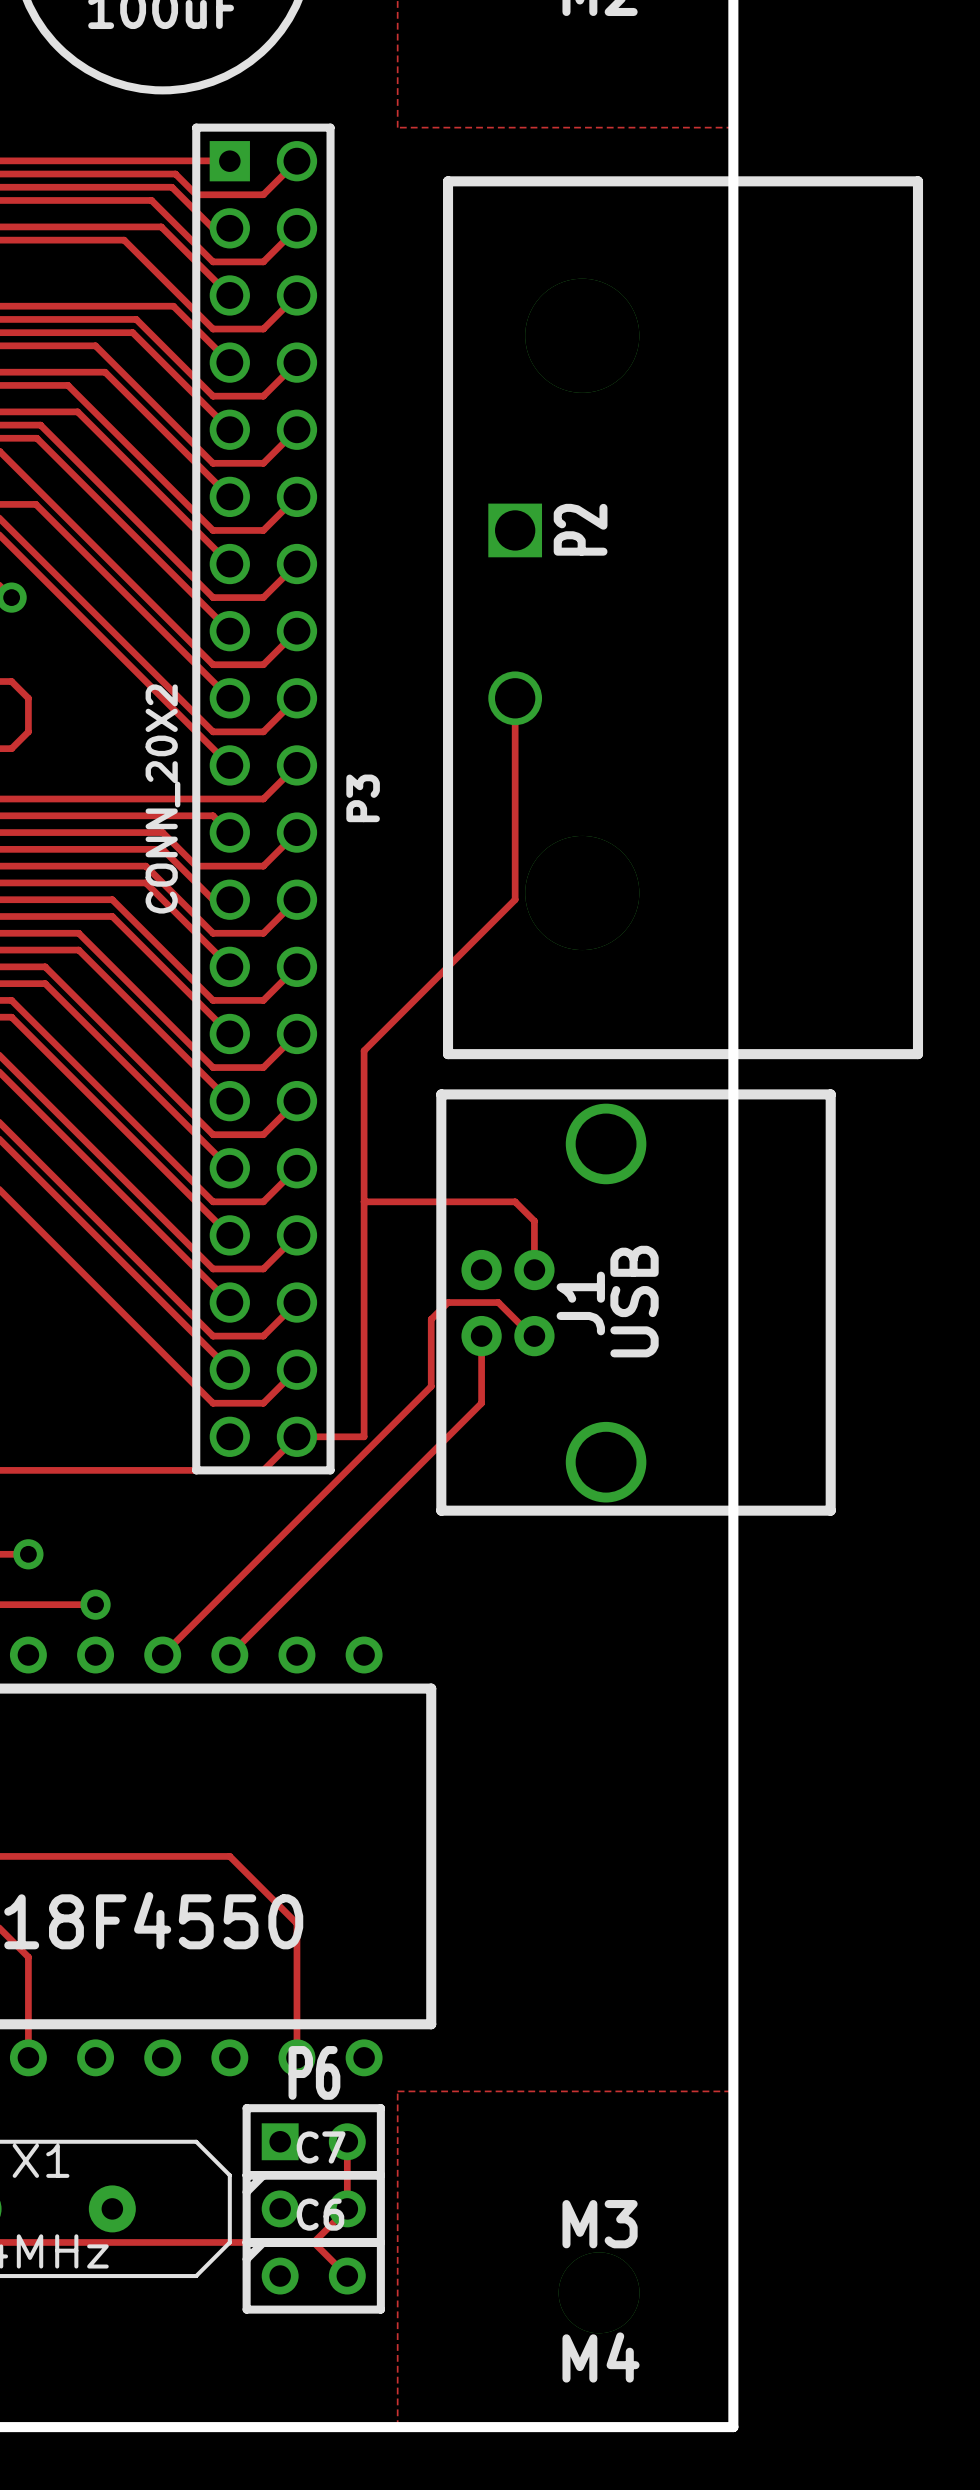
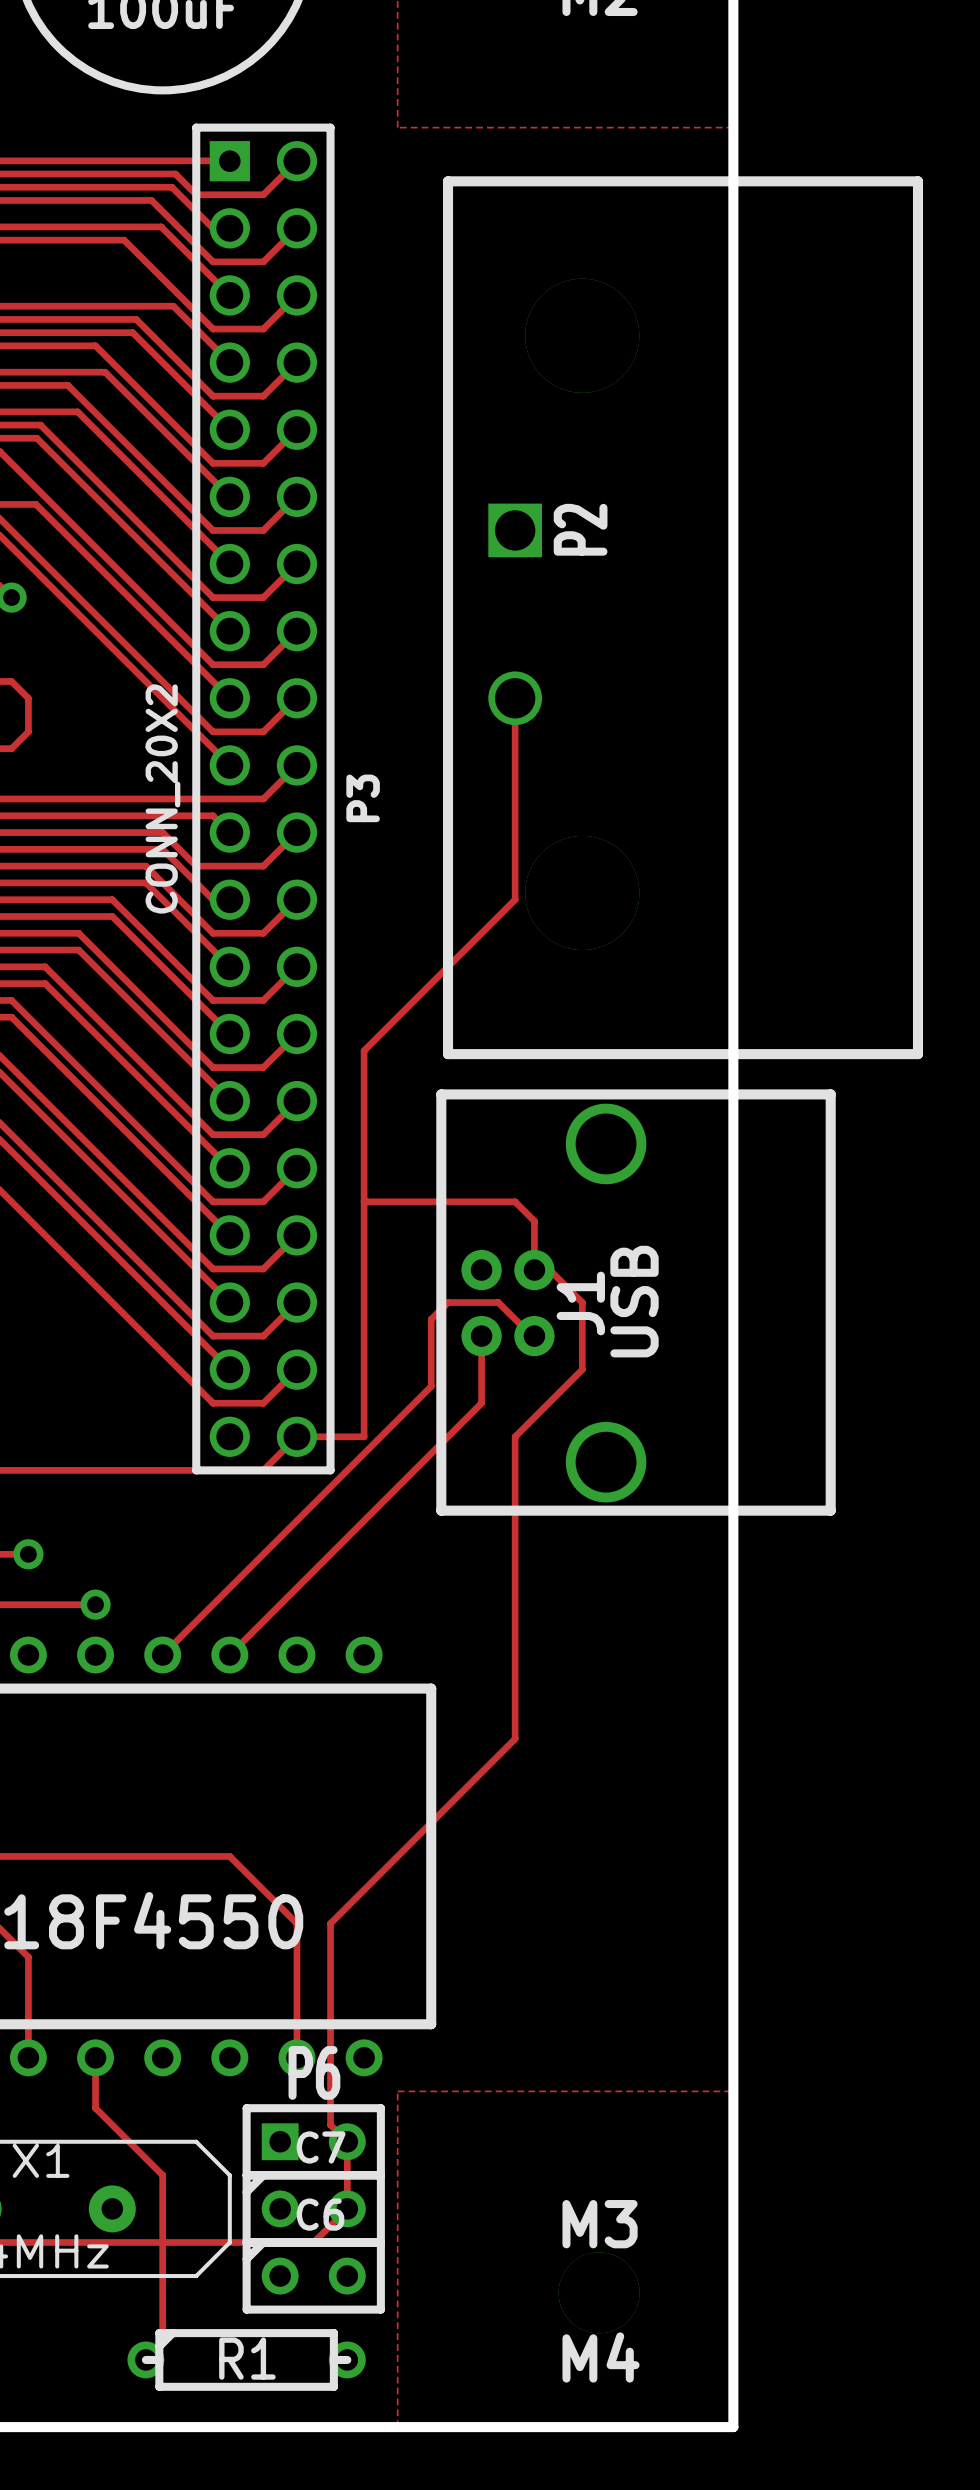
track: none -> (534, 1270) (549, 1270) (582, 1302) (582, 1369) (515, 1436) (515, 1738) (330, 1923) (330, 2124) (347, 2141)
track: none -> (95, 2057) (95, 2108) (162, 2175) (162, 2343) (145, 2359)
track: (313, 2242) (347, 2276) -> none
R1: none -> (246, 2359)

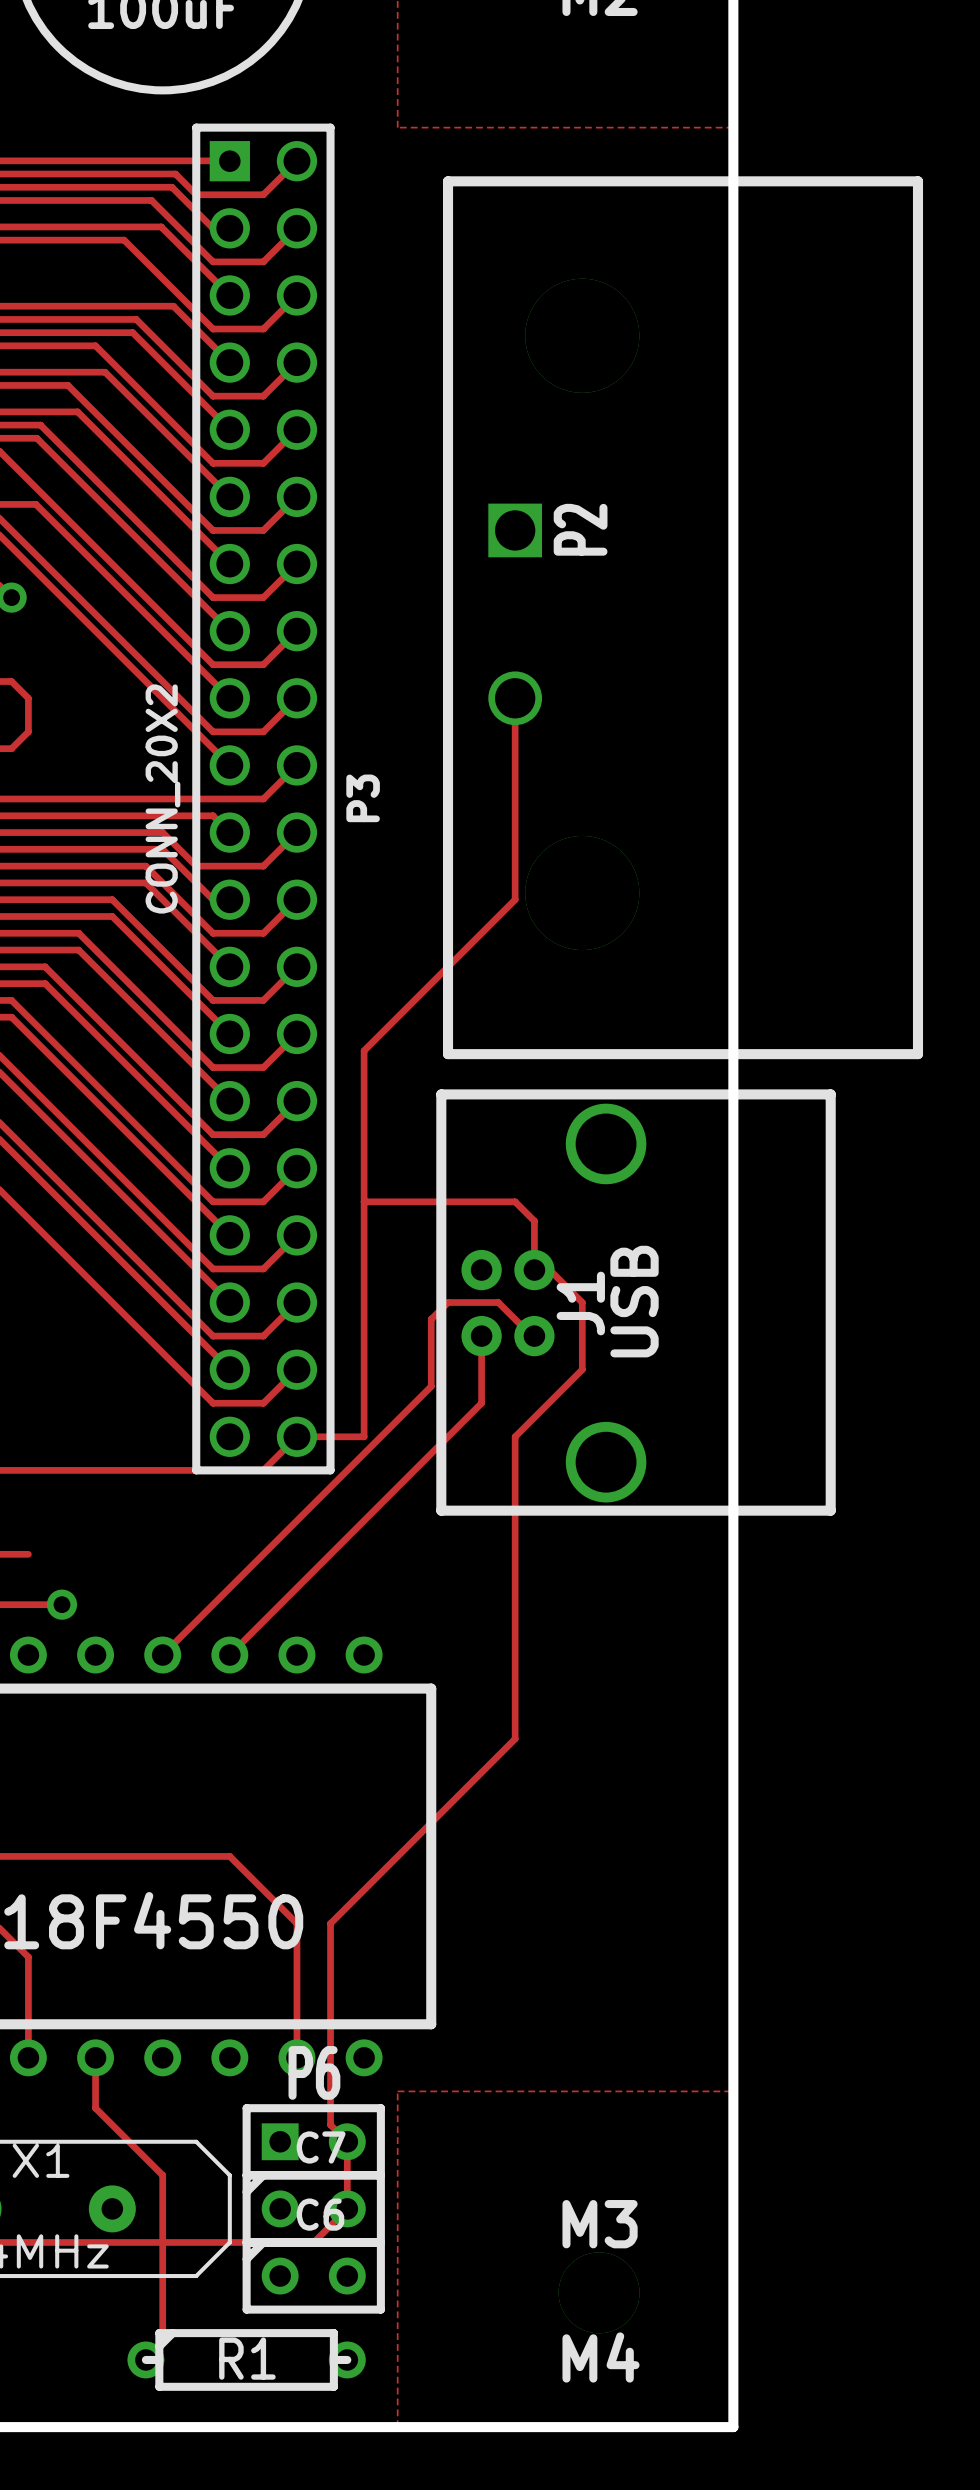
via: (28, 1554) -> none
track: (61, 1604) (95, 1604) -> none
via: none -> (61, 1604)
via: (95, 1604) -> none

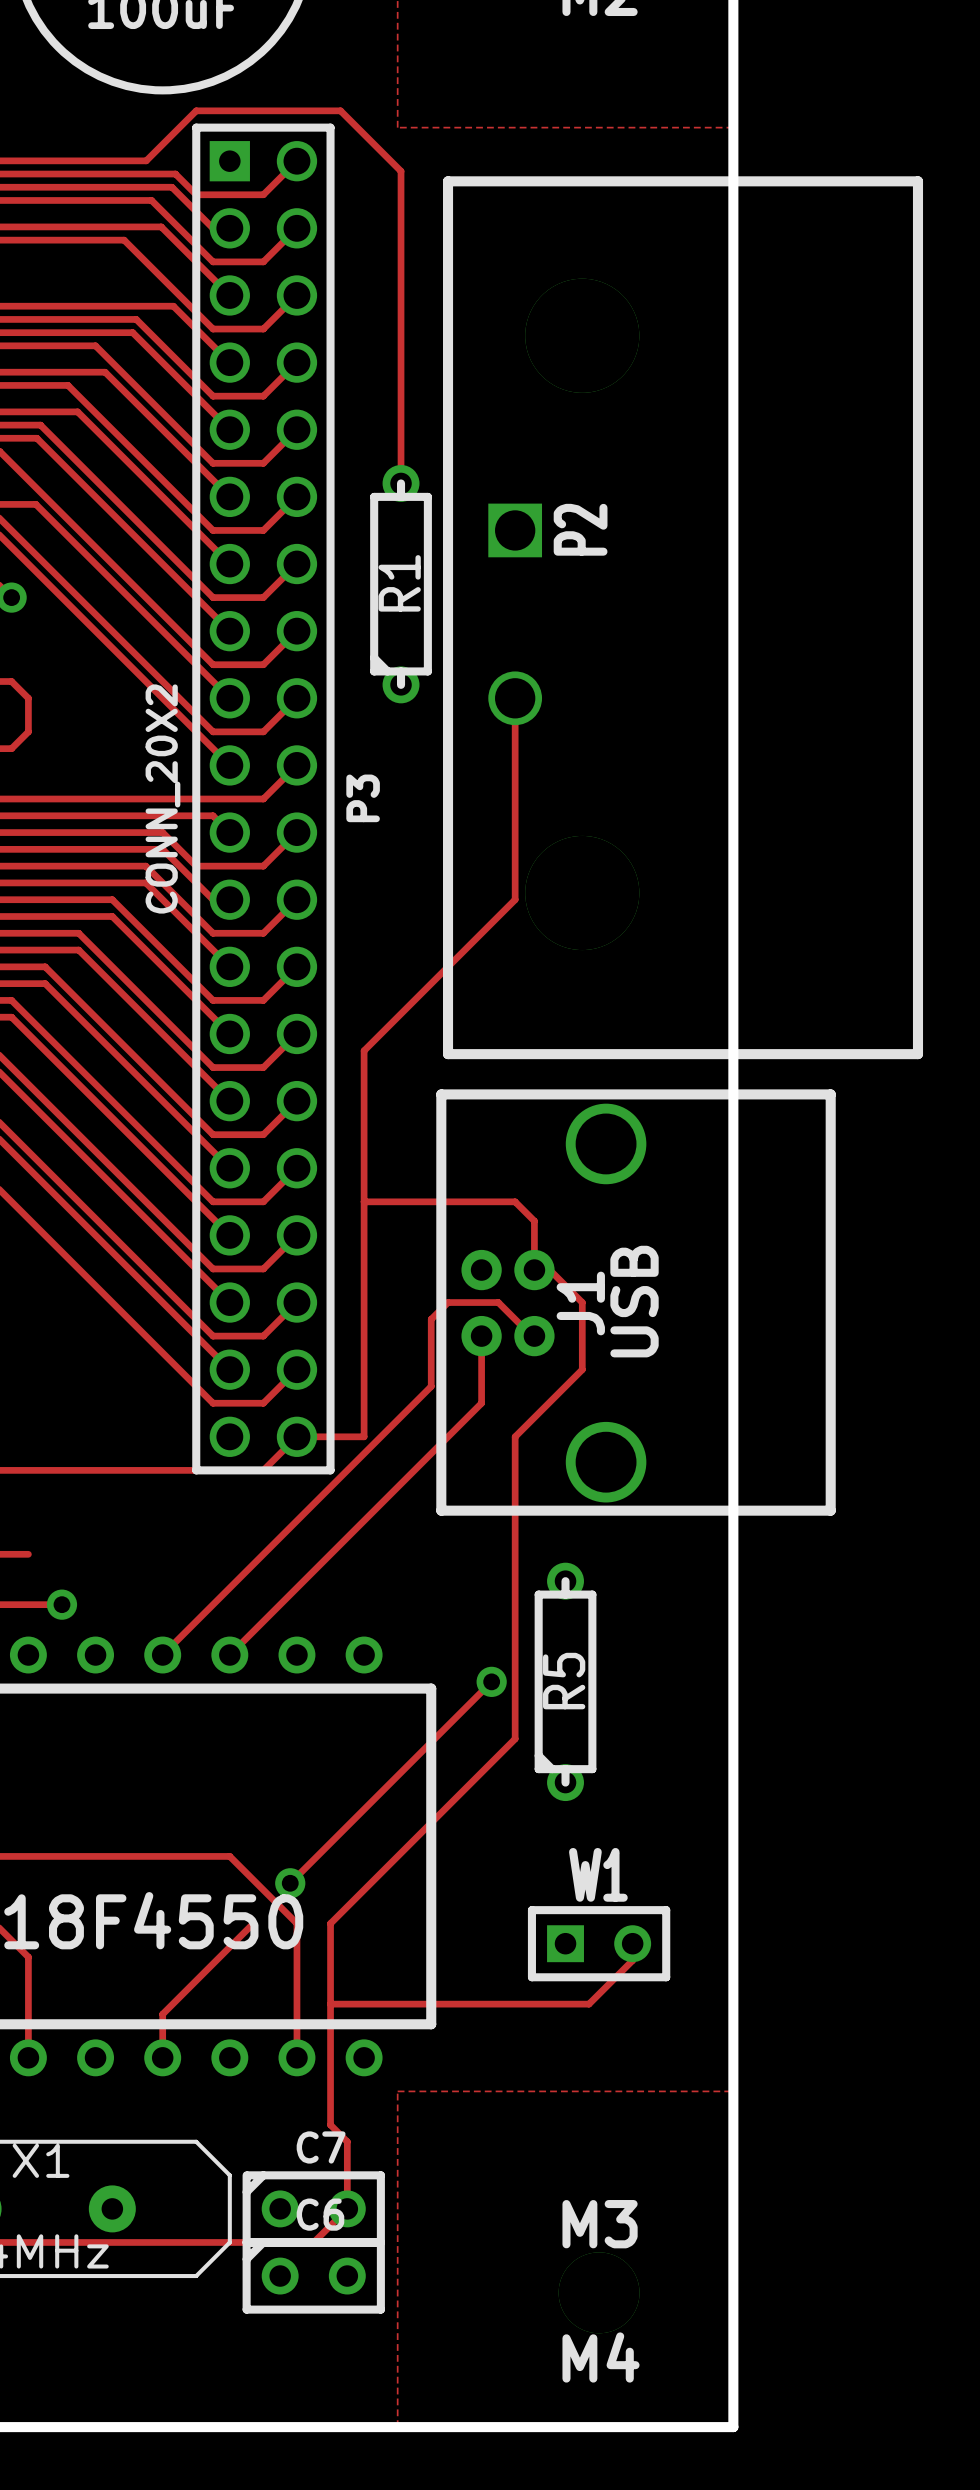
track: (146, 160) (229, 160) -> (146, 160) (196, 110) (340, 110) (401, 171) (401, 483)
track: none -> (491, 1681) (290, 1883)
via: none -> (491, 1681)
R5: none -> (565, 1681)
via: none -> (290, 1883)
track: none -> (253, 1923) (162, 2014) (162, 2057)
W1: none -> (599, 1943)
track: none -> (632, 1943) (632, 1960) (589, 2004) (330, 2004)
track: (95, 2057) (95, 2108) (162, 2175) (162, 2343) (145, 2359) -> none
P6: (313, 2141) -> none
R1 rotation: 0° (246, 2359) -> 90° counterclockwise (401, 584)
R1 position: (246, 2359) -> (401, 584)

